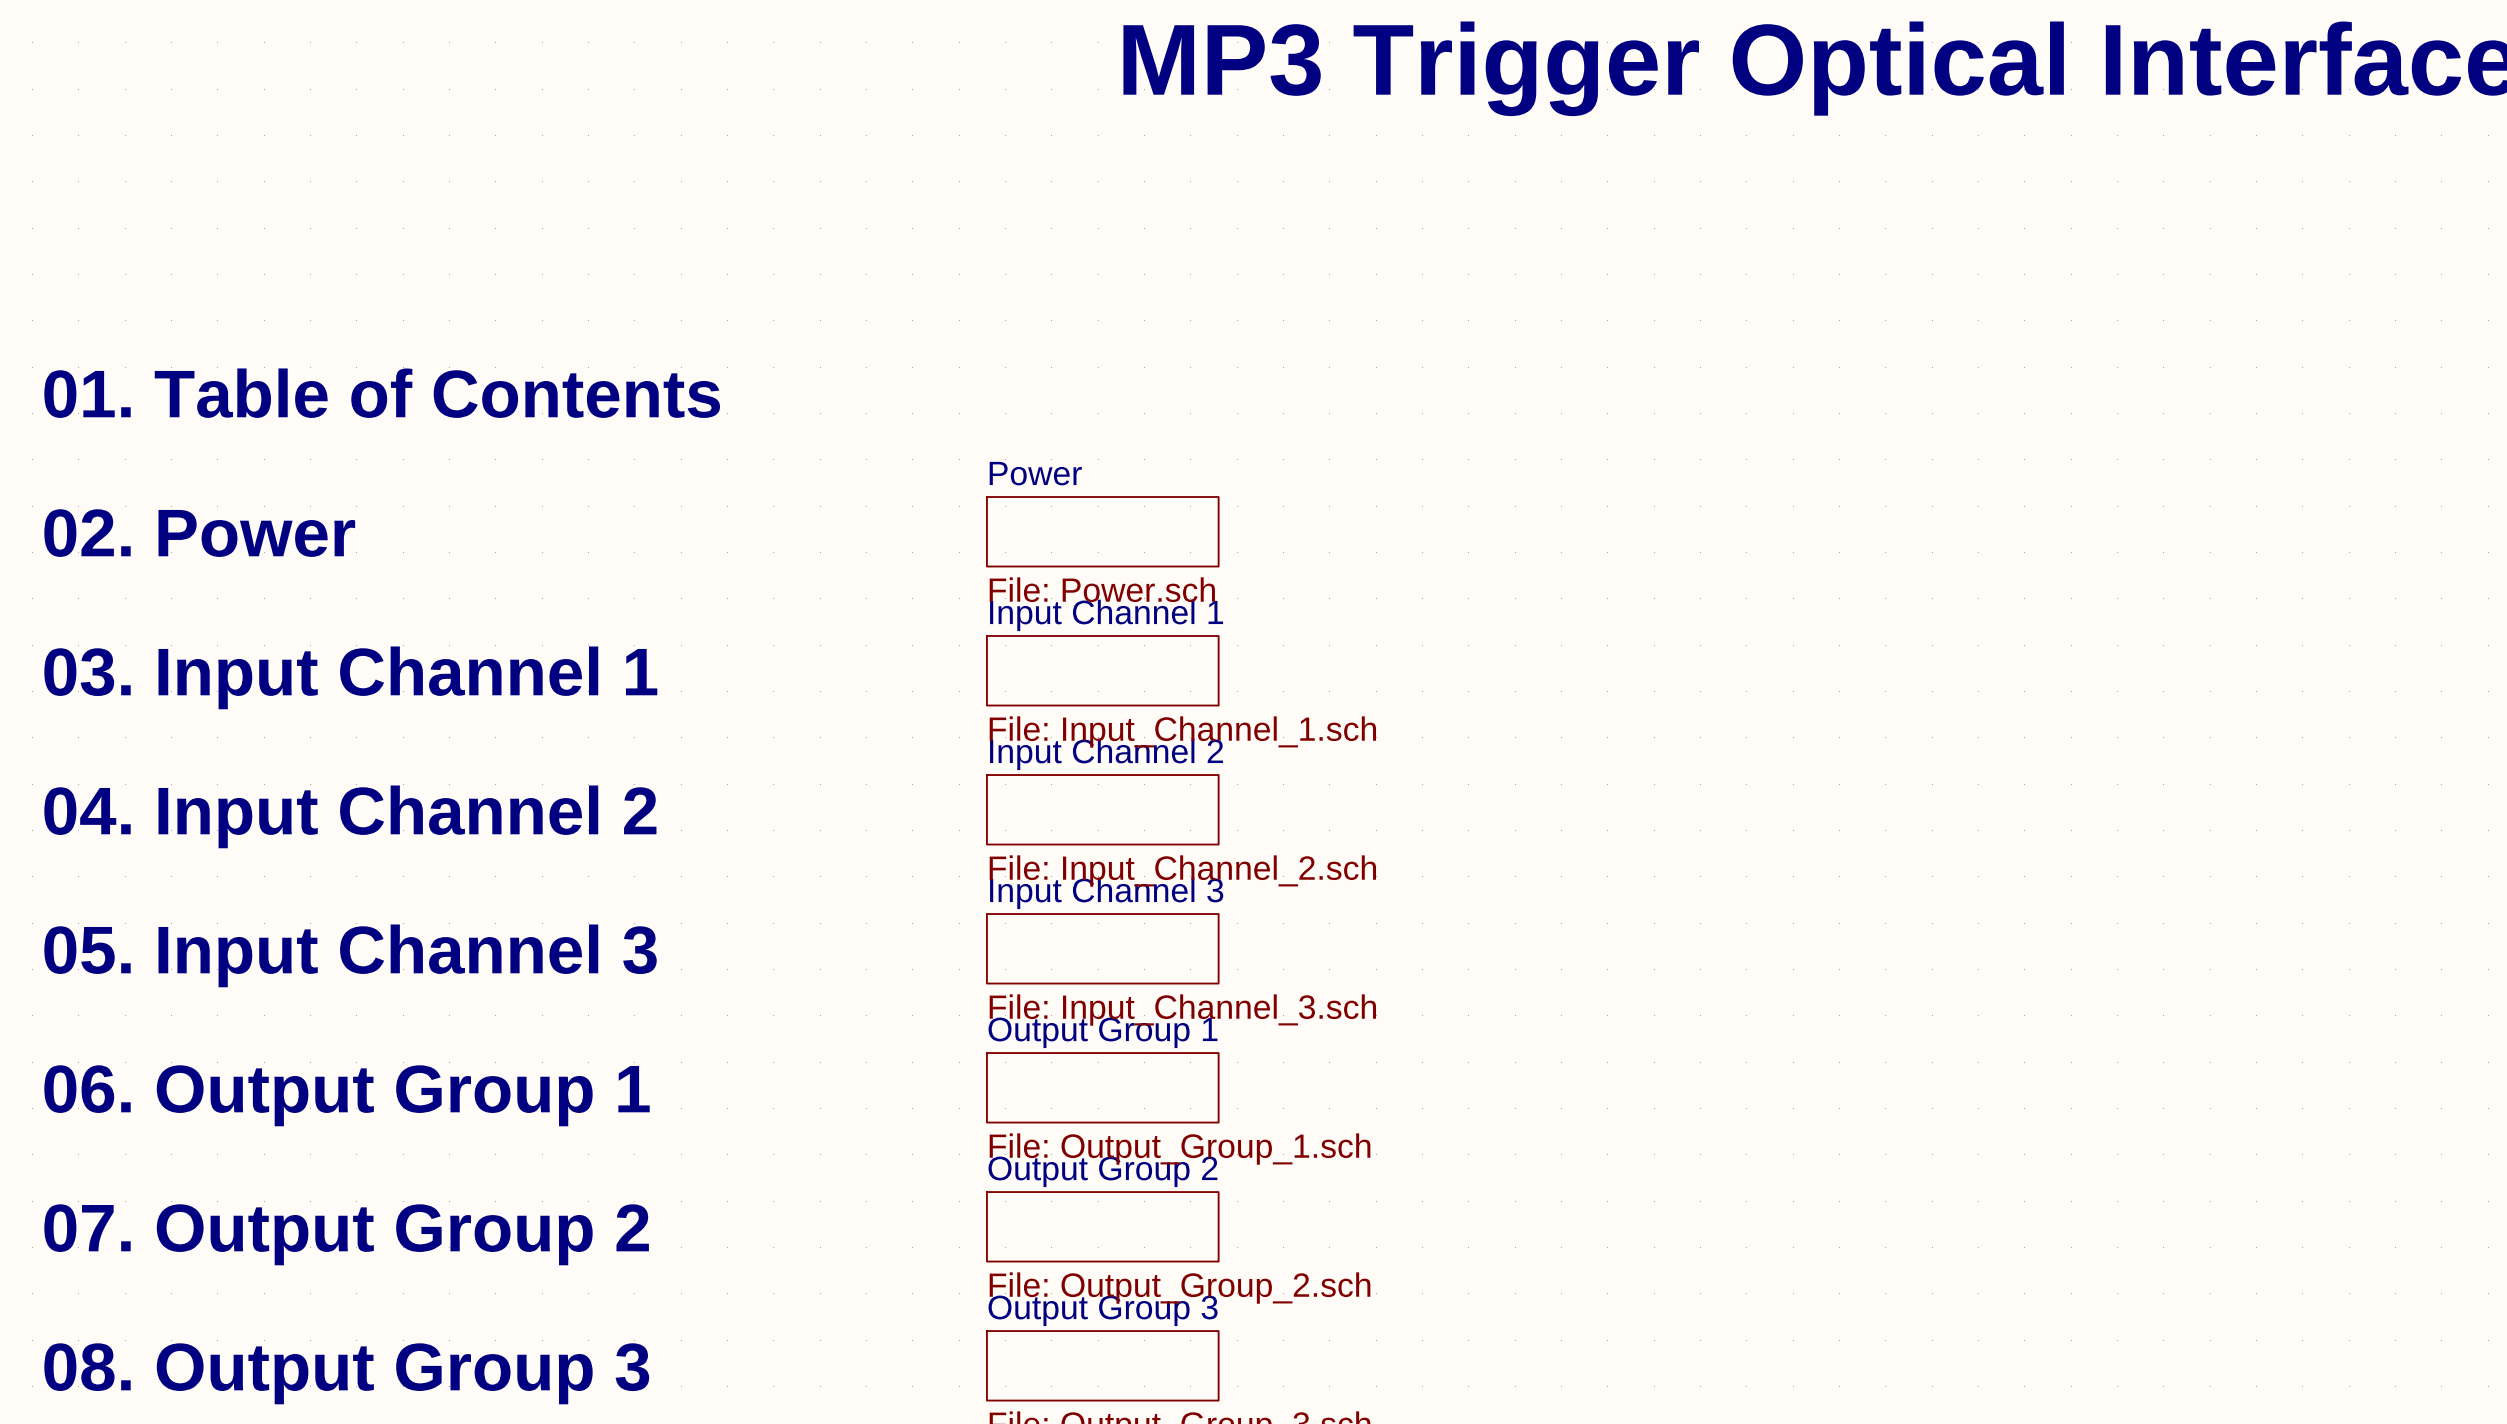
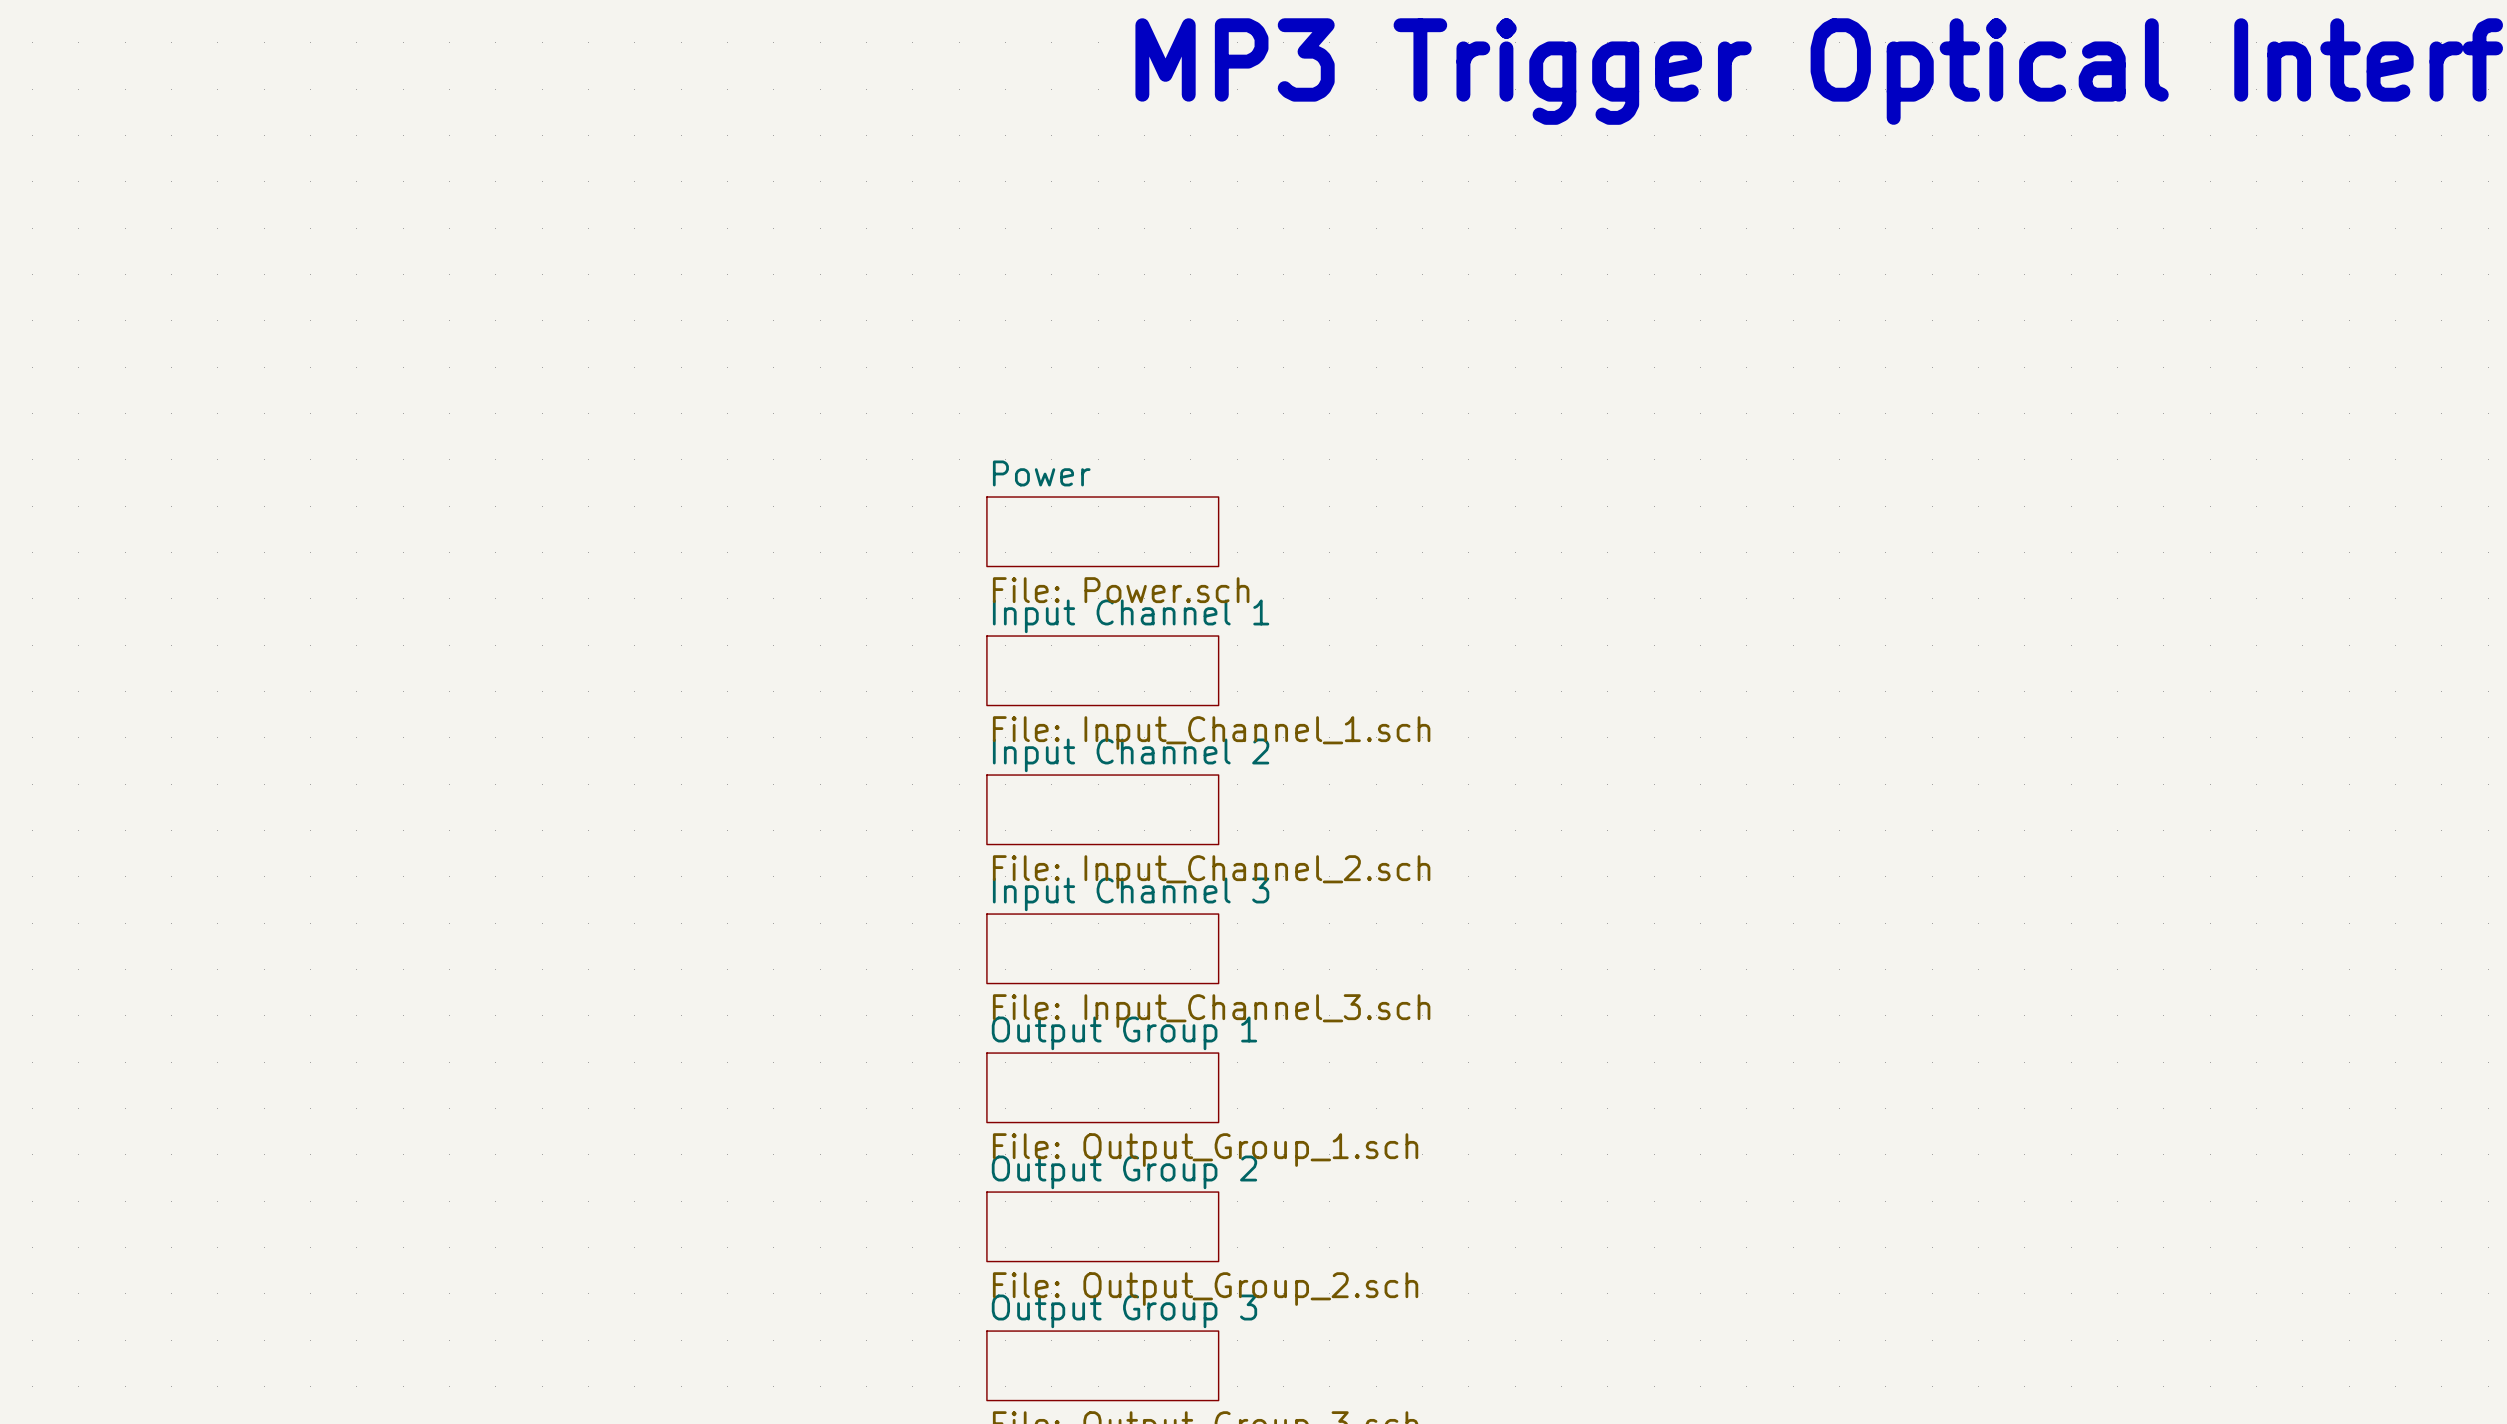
text: 01. Table of Contents (382, 393) -> none
text: 02. Power (199, 533) -> none
text: 03. Input Channel 1 (350, 677) -> none
text: 04. Input Channel 2 (350, 816) -> none
text: 05. Input Channel 3 (350, 955) -> none
text: 06. Output Group 1 (347, 1095) -> none
text: 07. Output Group 2 (346, 1234) -> none
text: 08. Output Group 3 (346, 1373) -> none

